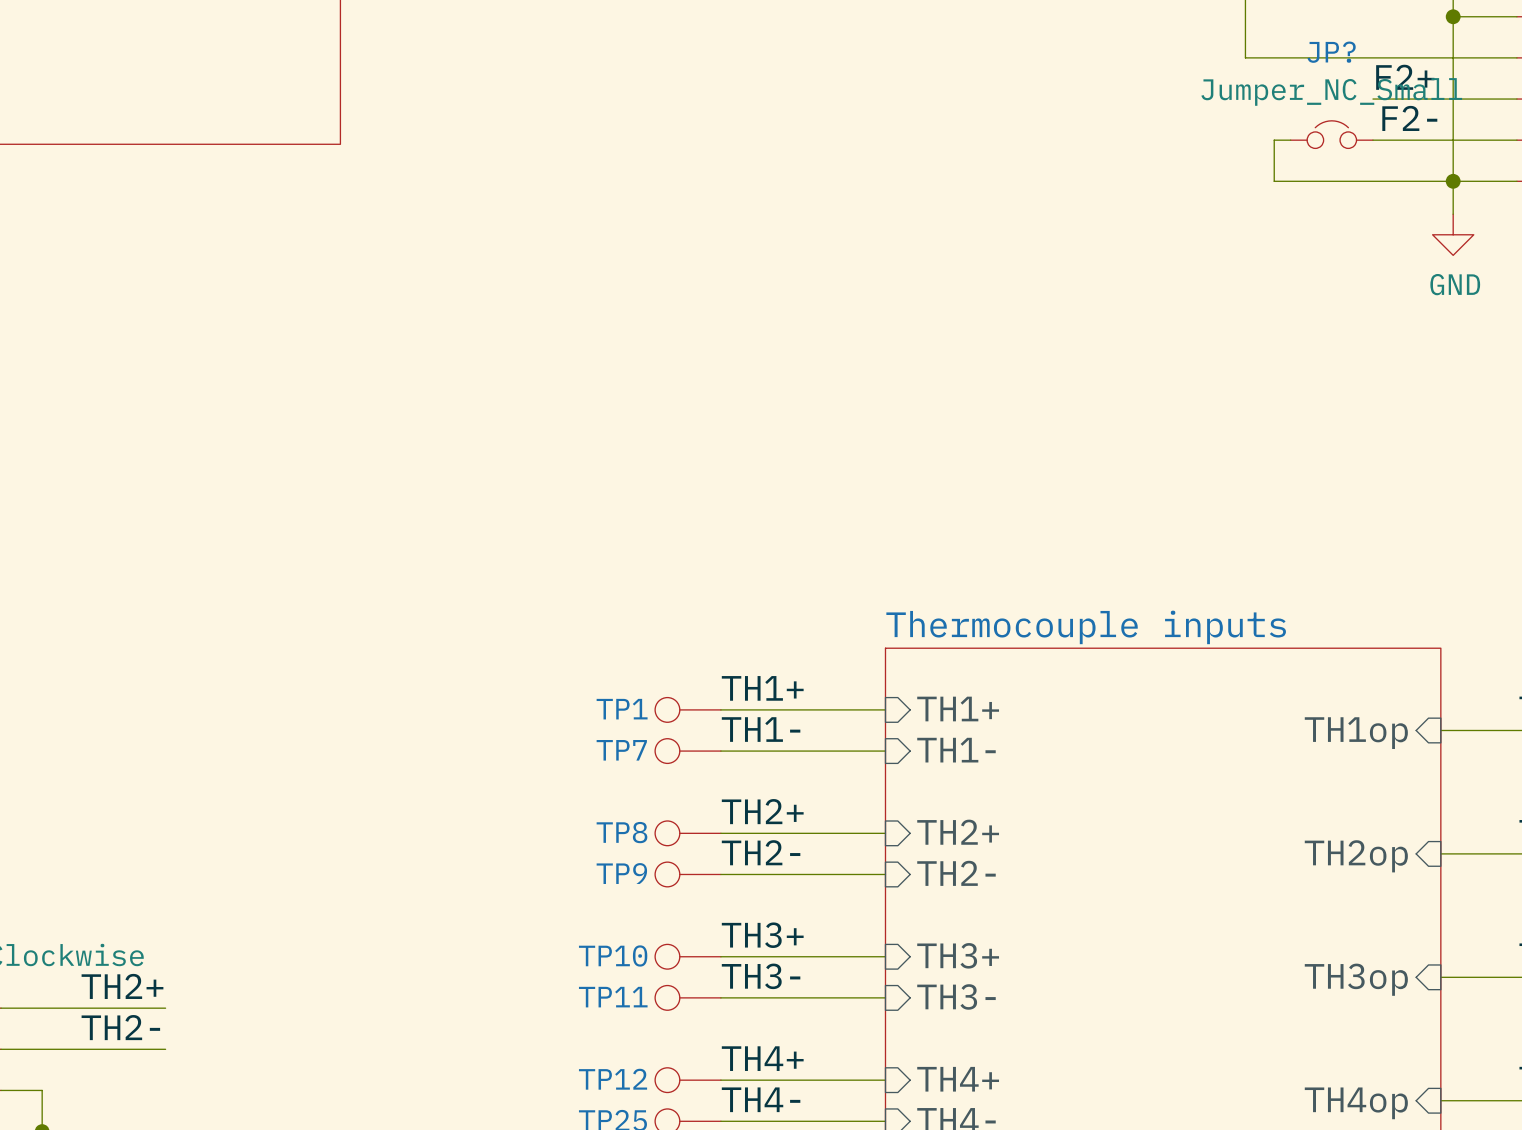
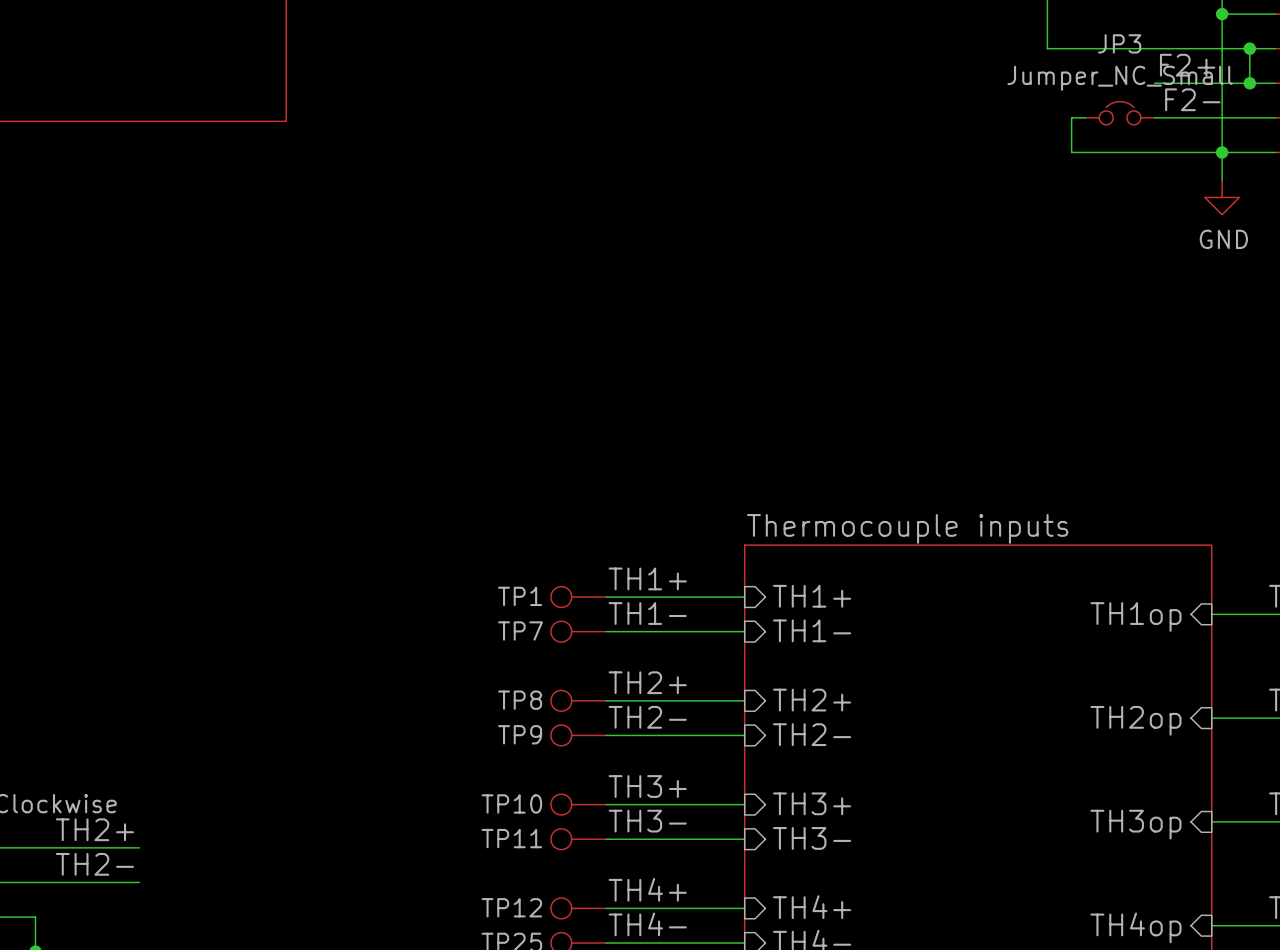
JP? name: JP? (1331, 52) -> JP3 (1119, 43)
wire: none -> (1249, 48) (1249, 83)
junction: none -> (1249, 48)
junction: none -> (1249, 83)

